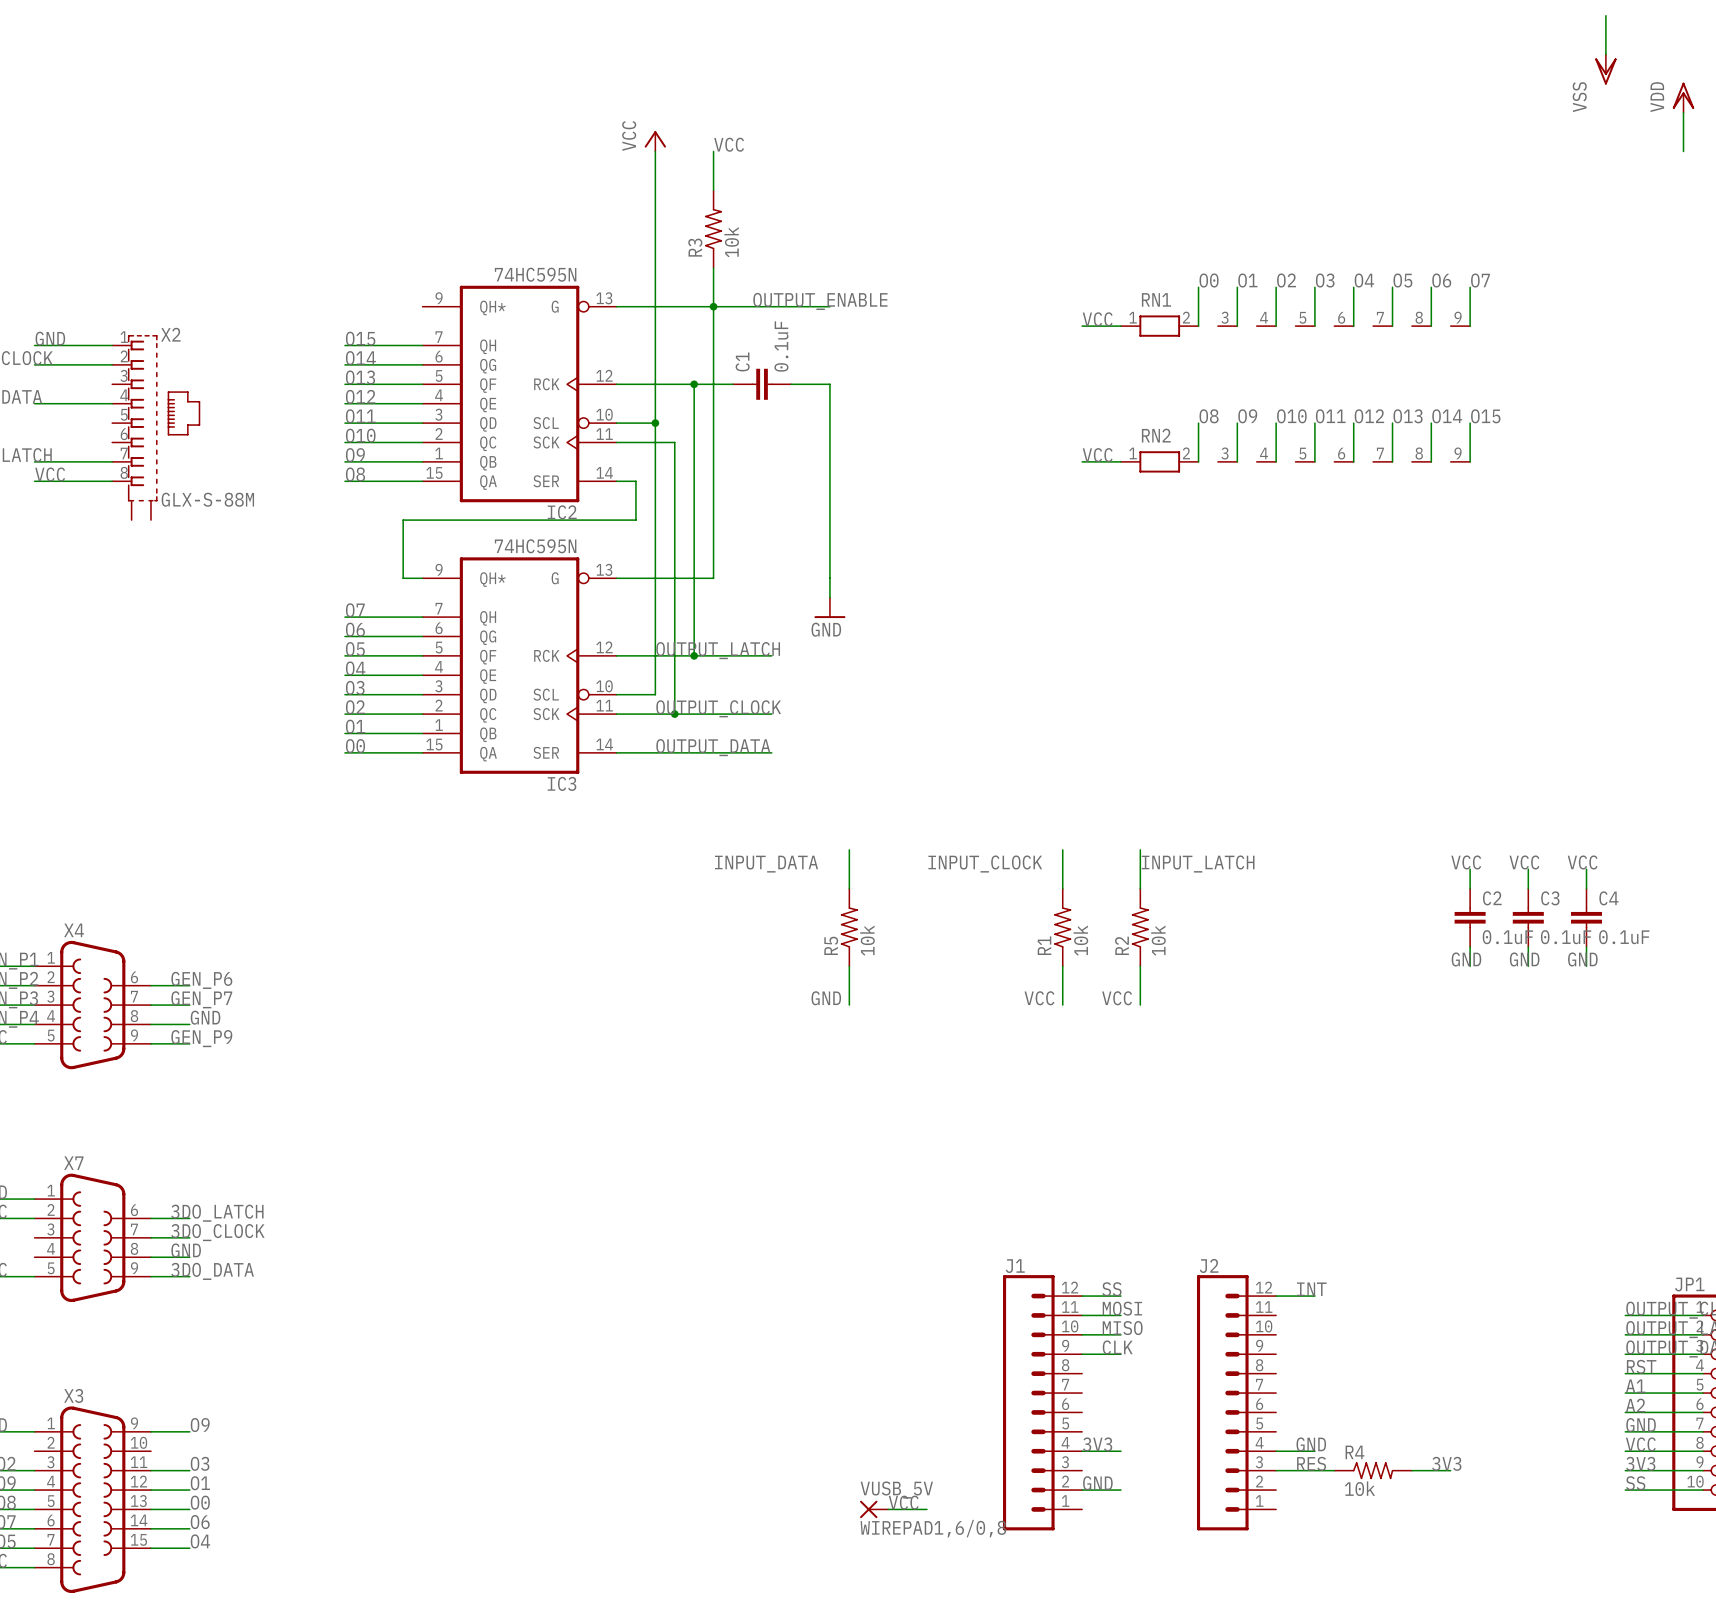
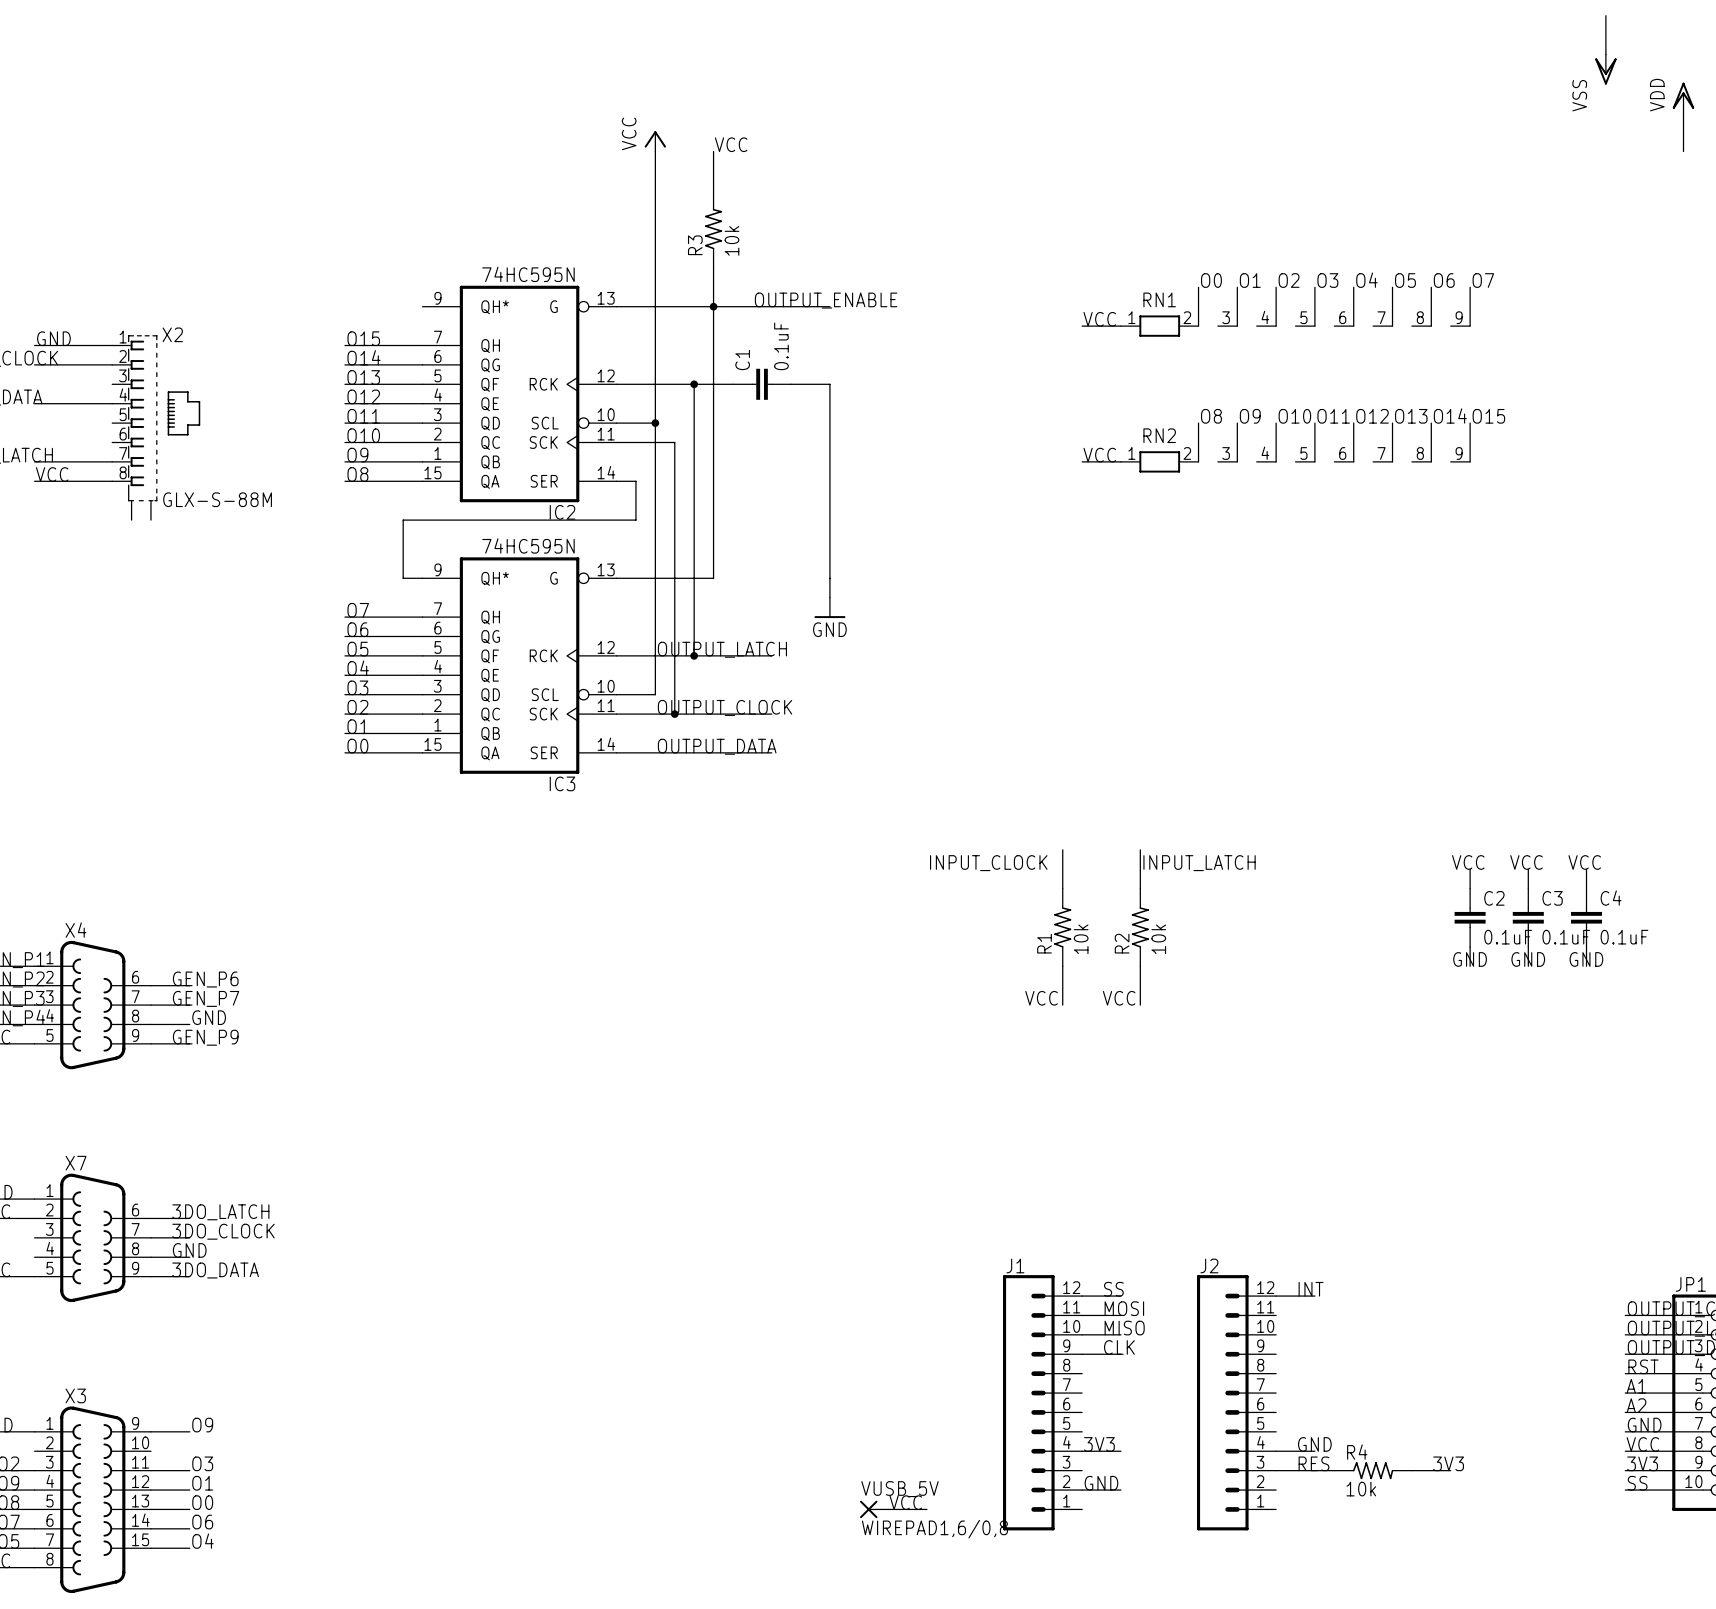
wire: (849, 849) (849, 888) -> none
label: INPUT_DATA (766, 864) -> none
R5: 10k (849, 927) -> none
wire: (849, 966) (849, 1005) -> none
label: GND (826, 998) -> none

